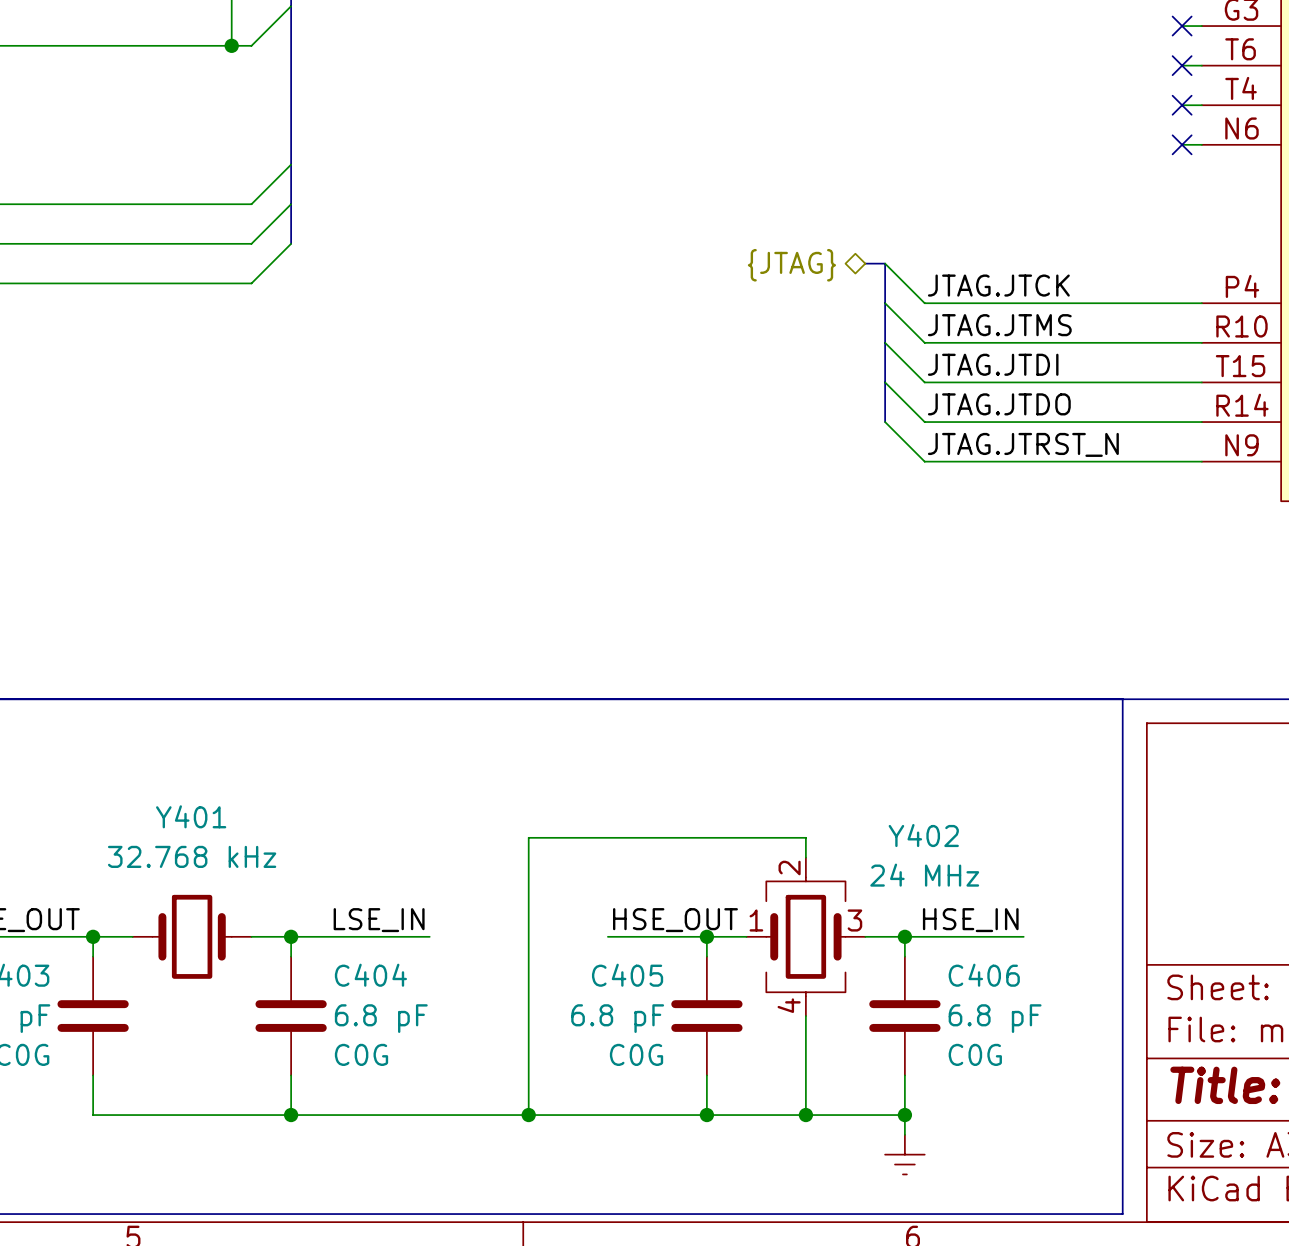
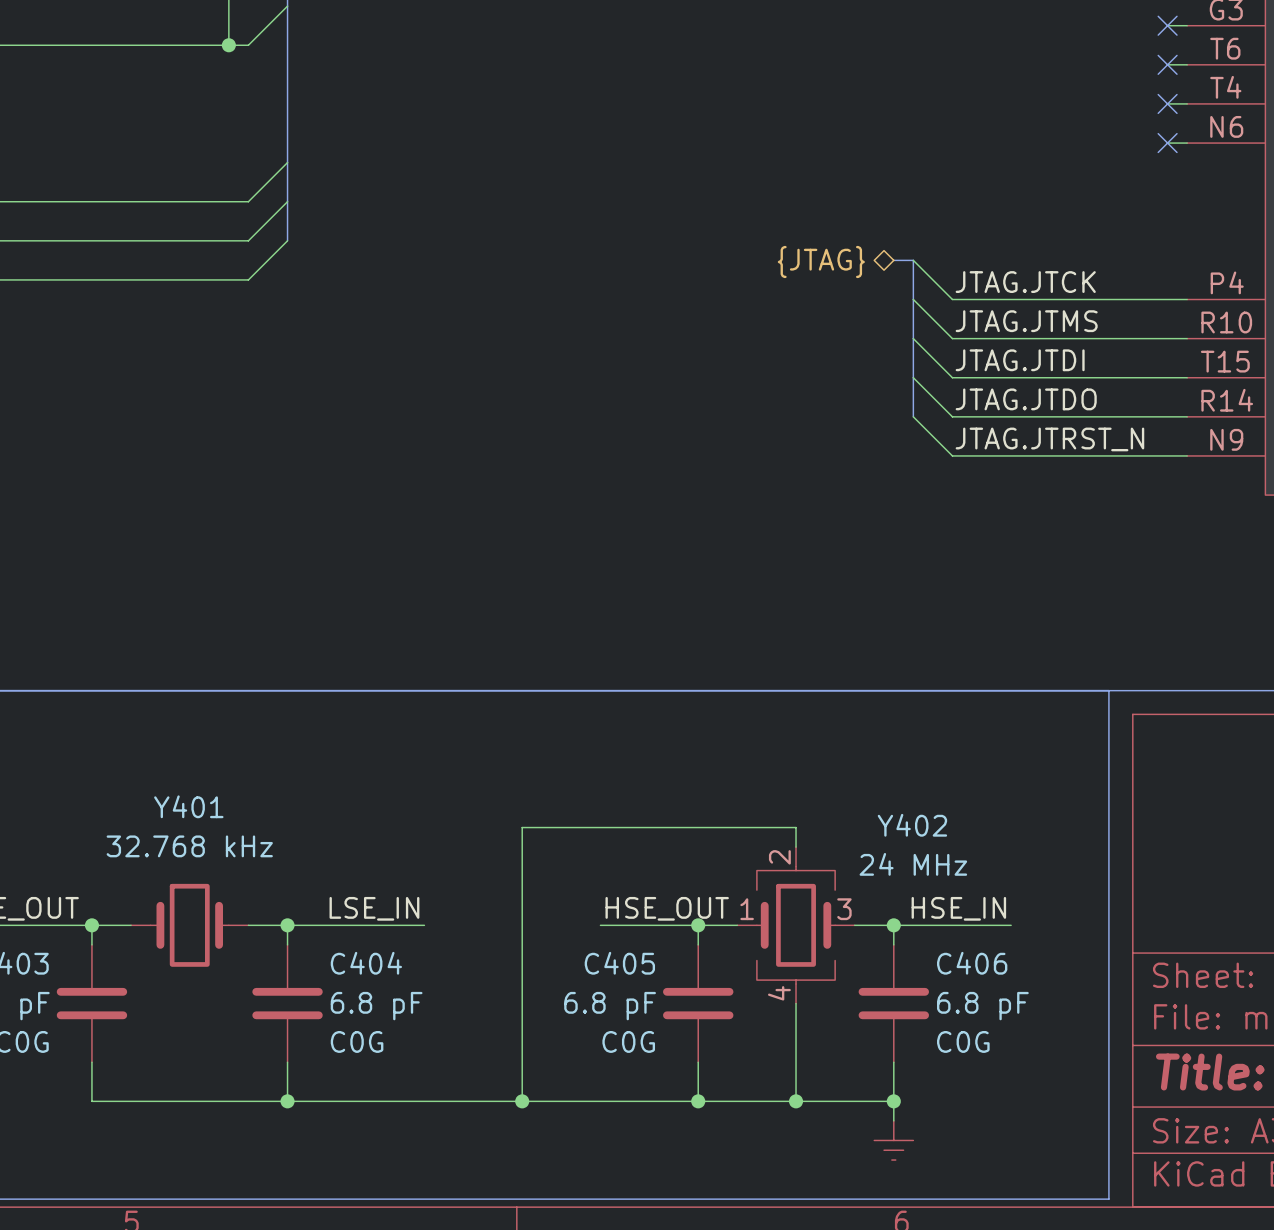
bus: (865, 263) (885, 263) (885, 422) -> (893, 260) (913, 260) (913, 416)
wire: (885, 263) (924, 303) (964, 303) -> (913, 260) (952, 299)
hierarchical label position: {JTAG} (791, 265) -> {JTAG} (821, 261)
label position: JTAG.JTCK (998, 285) -> JTAG.JTCK (1025, 282)
wire: (885, 303) (924, 342) (964, 342) -> (913, 299) (952, 338)
label position: JTAG.JTMS (999, 325) -> JTAG.JTMS (1026, 321)
wire: (885, 342) (924, 382) (964, 382) -> (913, 338) (952, 377)
label position: JTAG.JTDI (993, 364) -> JTAG.JTDI (1020, 360)
wire: (885, 382) (924, 422) (964, 422) -> (913, 377) (952, 416)
label position: JTAG.JTDO (999, 404) -> JTAG.JTDO (1026, 399)
wire: (885, 422) (924, 461) (964, 461) -> (913, 416) (952, 455)
label position: JTAG.JTRST_N (1023, 444) -> JTAG.JTRST_N (1049, 439)

